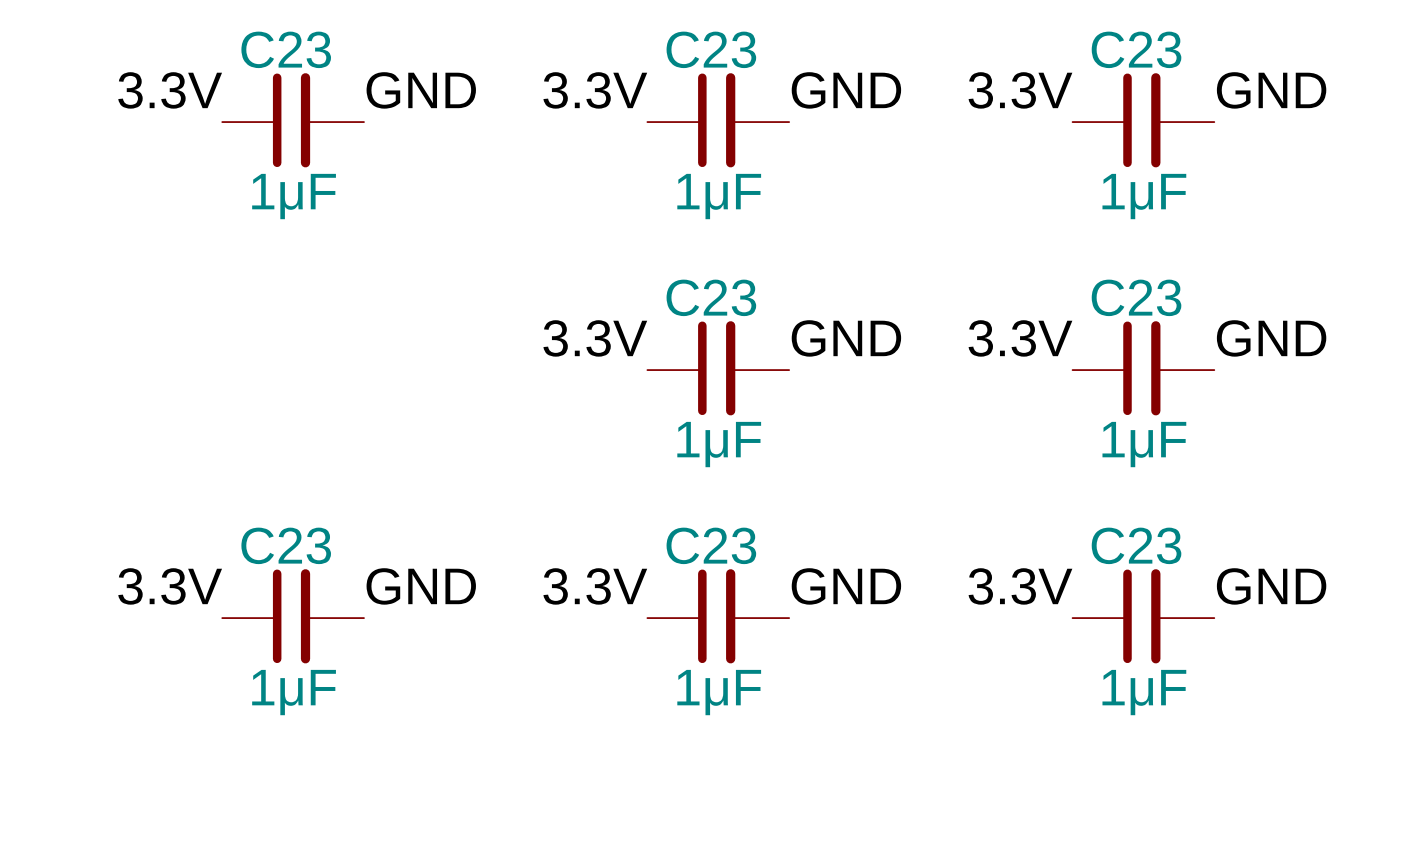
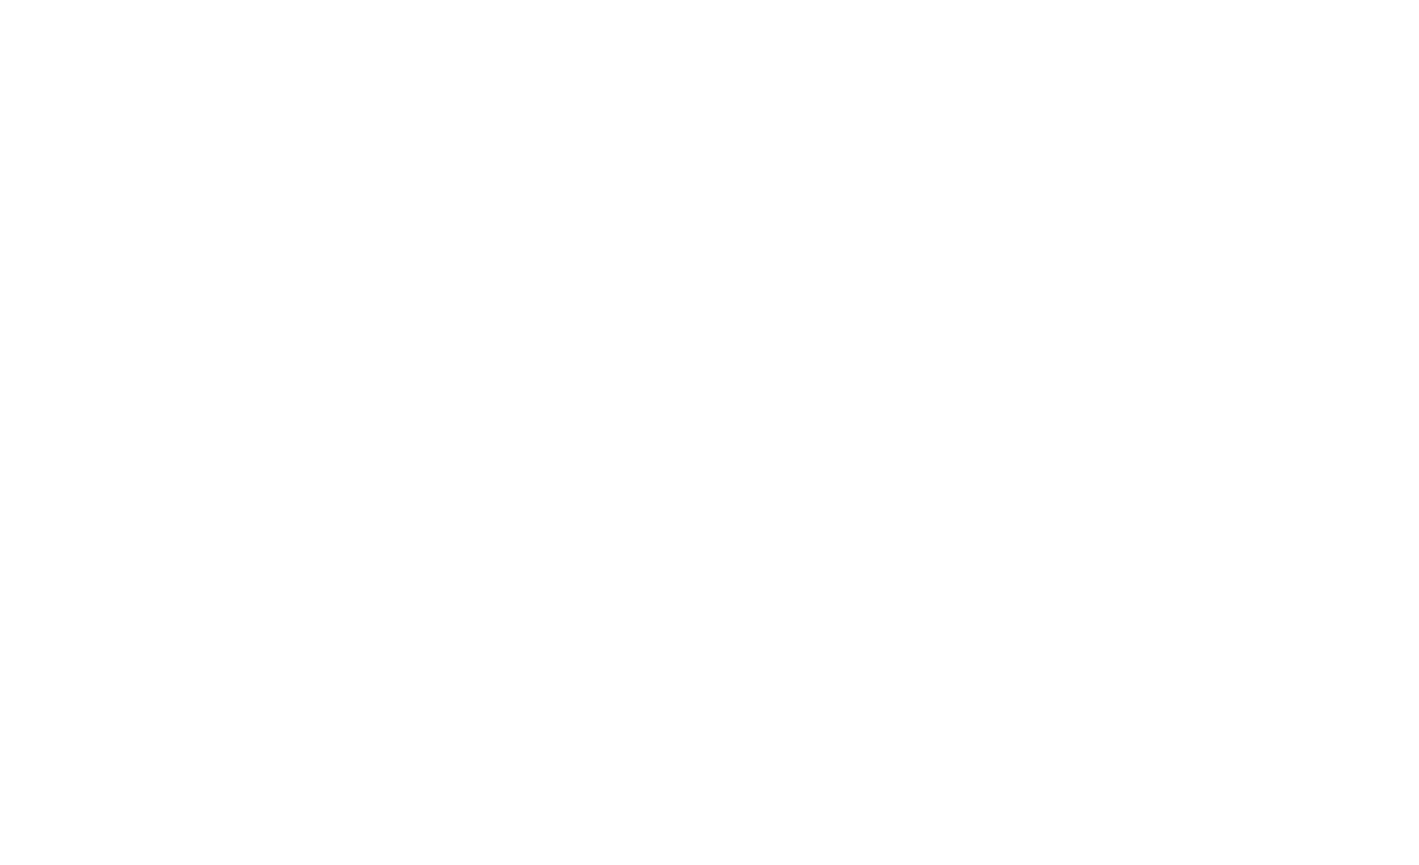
label: 3.3V (170, 90) -> none
label: GND (421, 90) -> none
label: 3.3V (595, 90) -> none
label: GND (846, 90) -> none
label: 3.3V (1020, 90) -> none
label: GND (1271, 90) -> none
C23: 1μF (293, 120) -> none
C23: 1μF (718, 120) -> none
C23: 1μF (1143, 120) -> none
label: 3.3V (595, 338) -> none
label: GND (846, 338) -> none
label: 3.3V (1020, 338) -> none
label: GND (1271, 338) -> none
C23: 1μF (718, 368) -> none
C23: 1μF (1143, 368) -> none
label: 3.3V (170, 586) -> none
label: GND (421, 586) -> none
label: 3.3V (595, 586) -> none
label: GND (846, 586) -> none
label: 3.3V (1020, 586) -> none
label: GND (1271, 586) -> none
C23: 1μF (293, 616) -> none
C23: 1μF (718, 616) -> none
C23: 1μF (1143, 616) -> none

